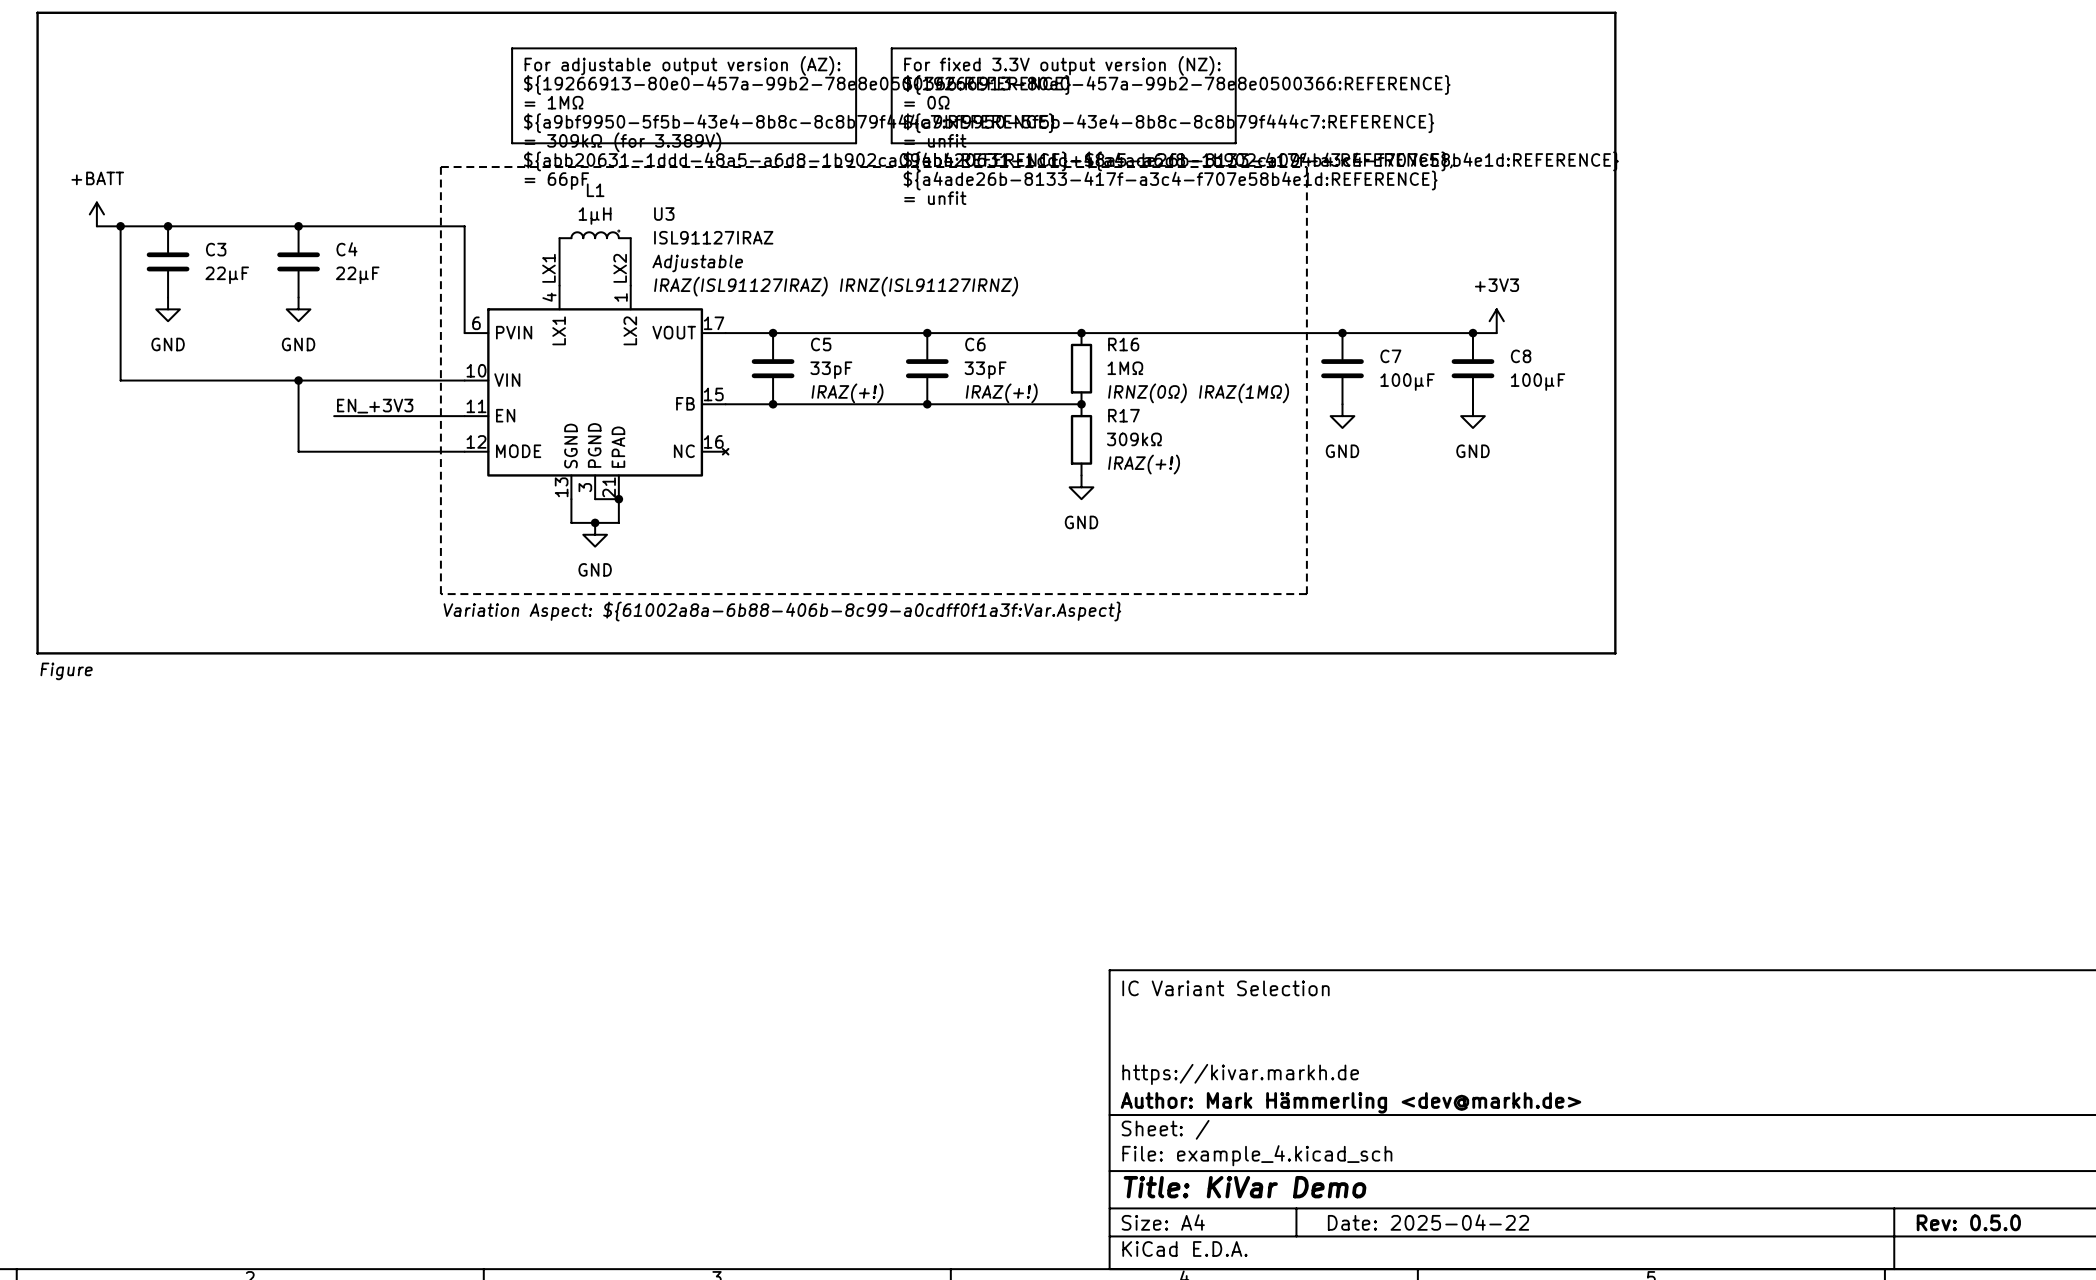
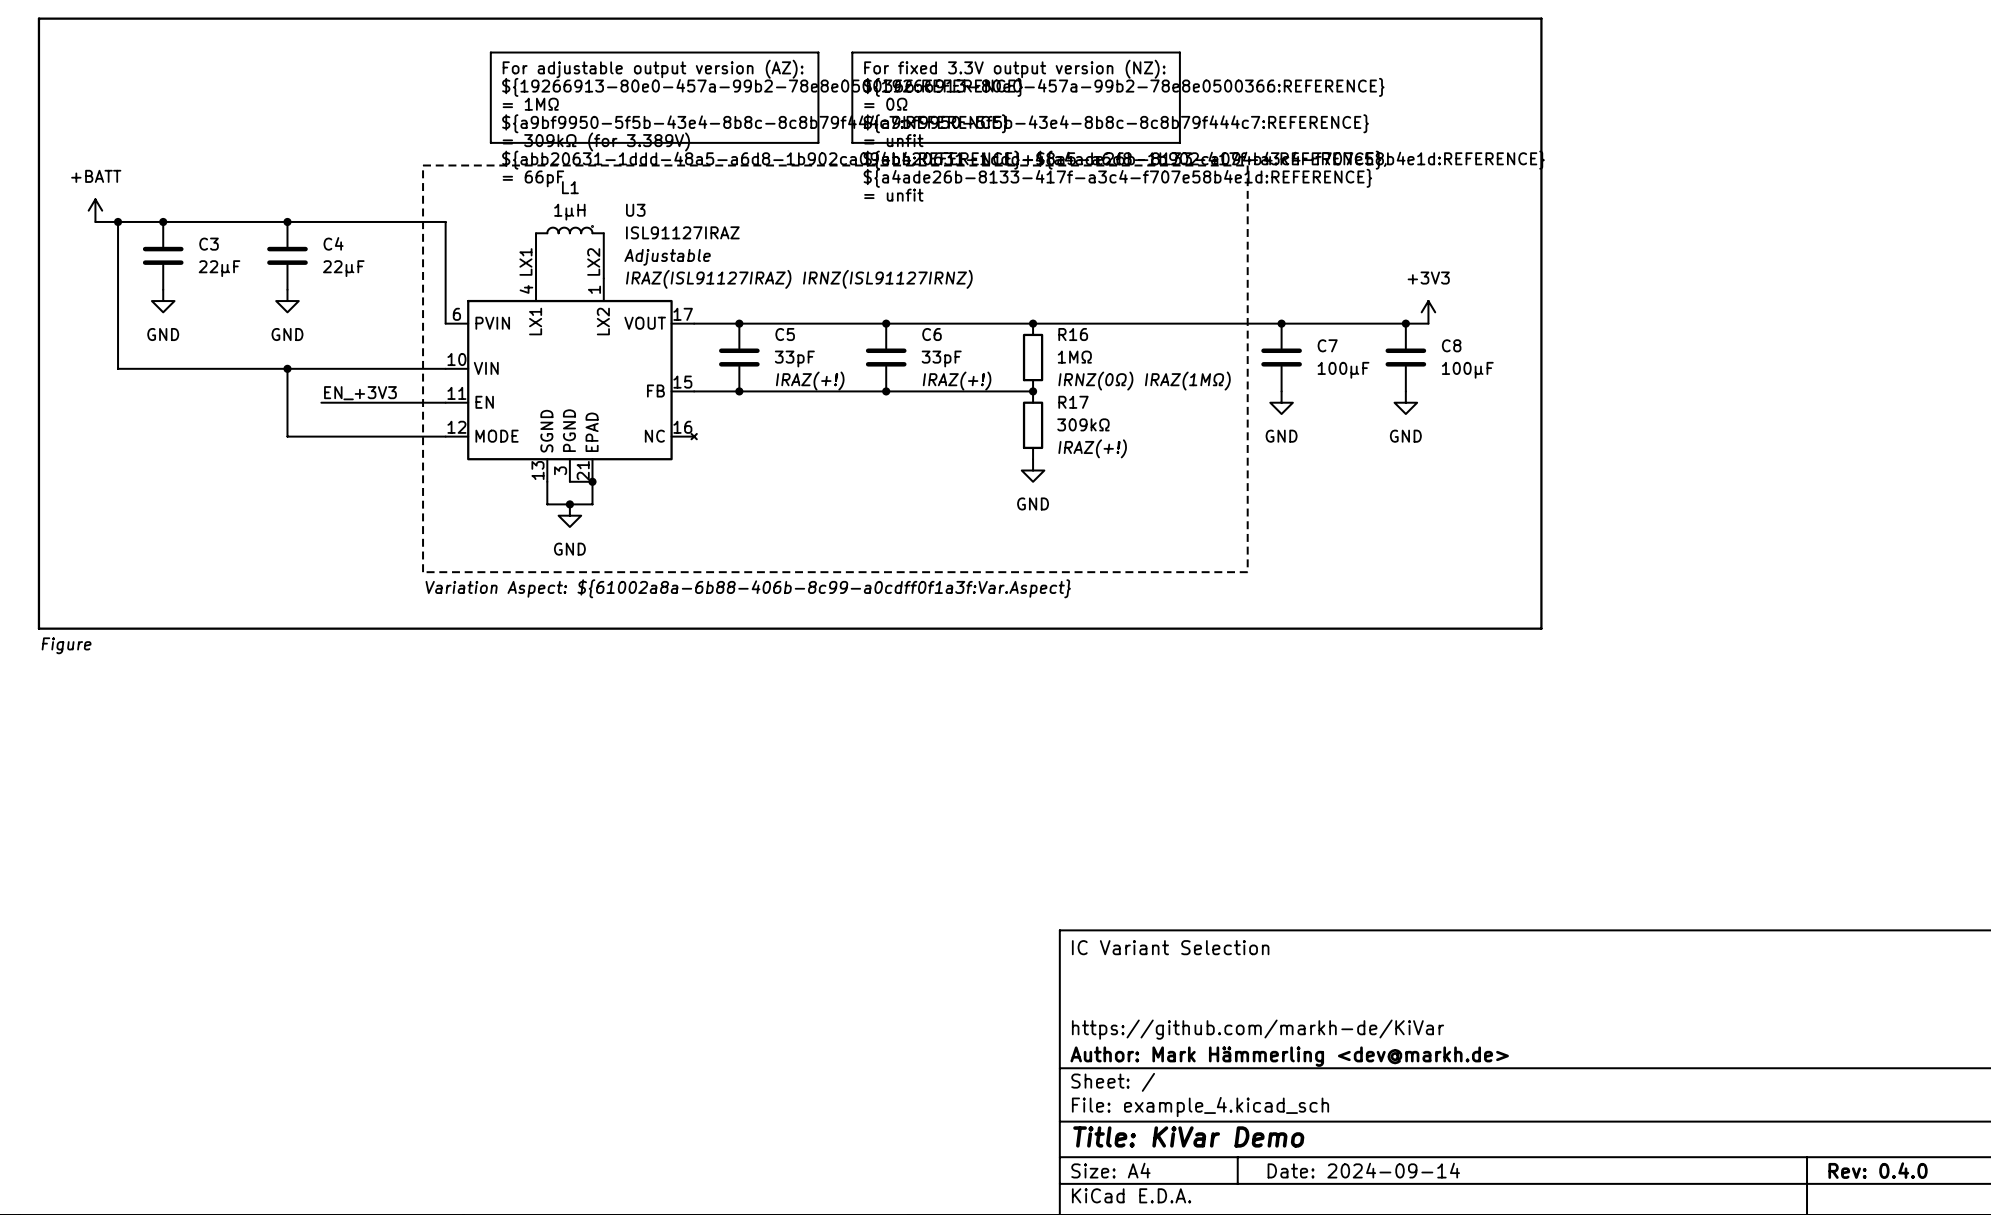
title block: https://kivar.markh.de (1240, 1074) -> https://github.com/markh-de/KiVar (1258, 1029)
title block: Date: 2025-04-22 (1428, 1222) -> Date: 2024-09-14 (1363, 1170)
title block: Rev: 0.5.0 (1968, 1222) -> Rev: 0.4.0 (1878, 1170)

